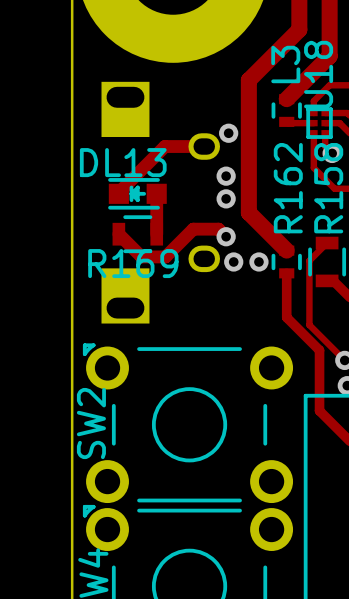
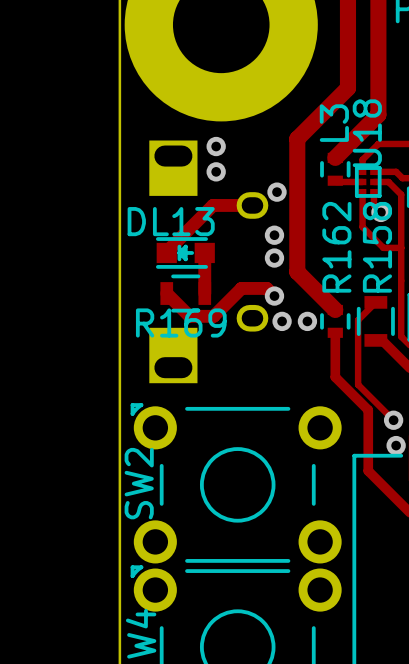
via: none -> (216, 146)
via: none -> (216, 171)

